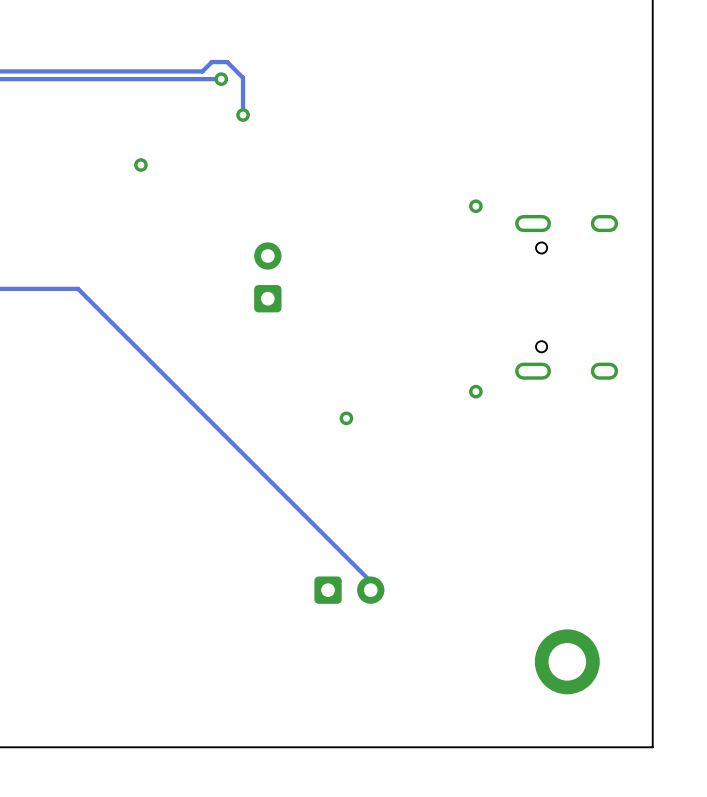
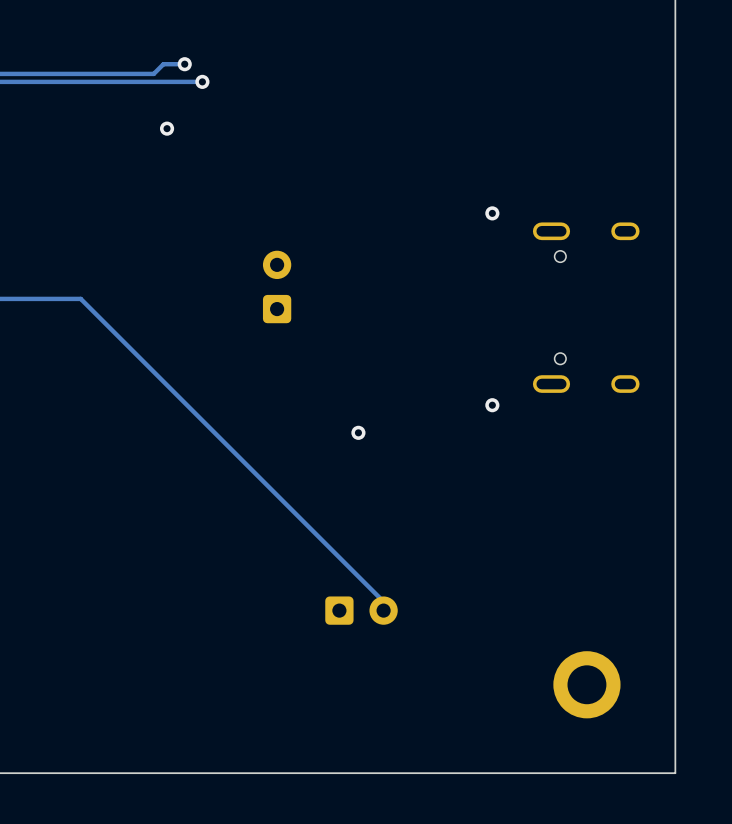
via: none -> (184, 64)
track: (148, 71) (202, 71) (211, 62) (227, 62) (243, 77) (243, 115) -> (153, 73) (163, 64) (184, 64)
via: none -> (202, 81)
track: (221, 79) (195, 79) -> none
via: (221, 79) -> none
via: (243, 115) -> none
via: none -> (167, 128)
via: (140, 165) -> none

